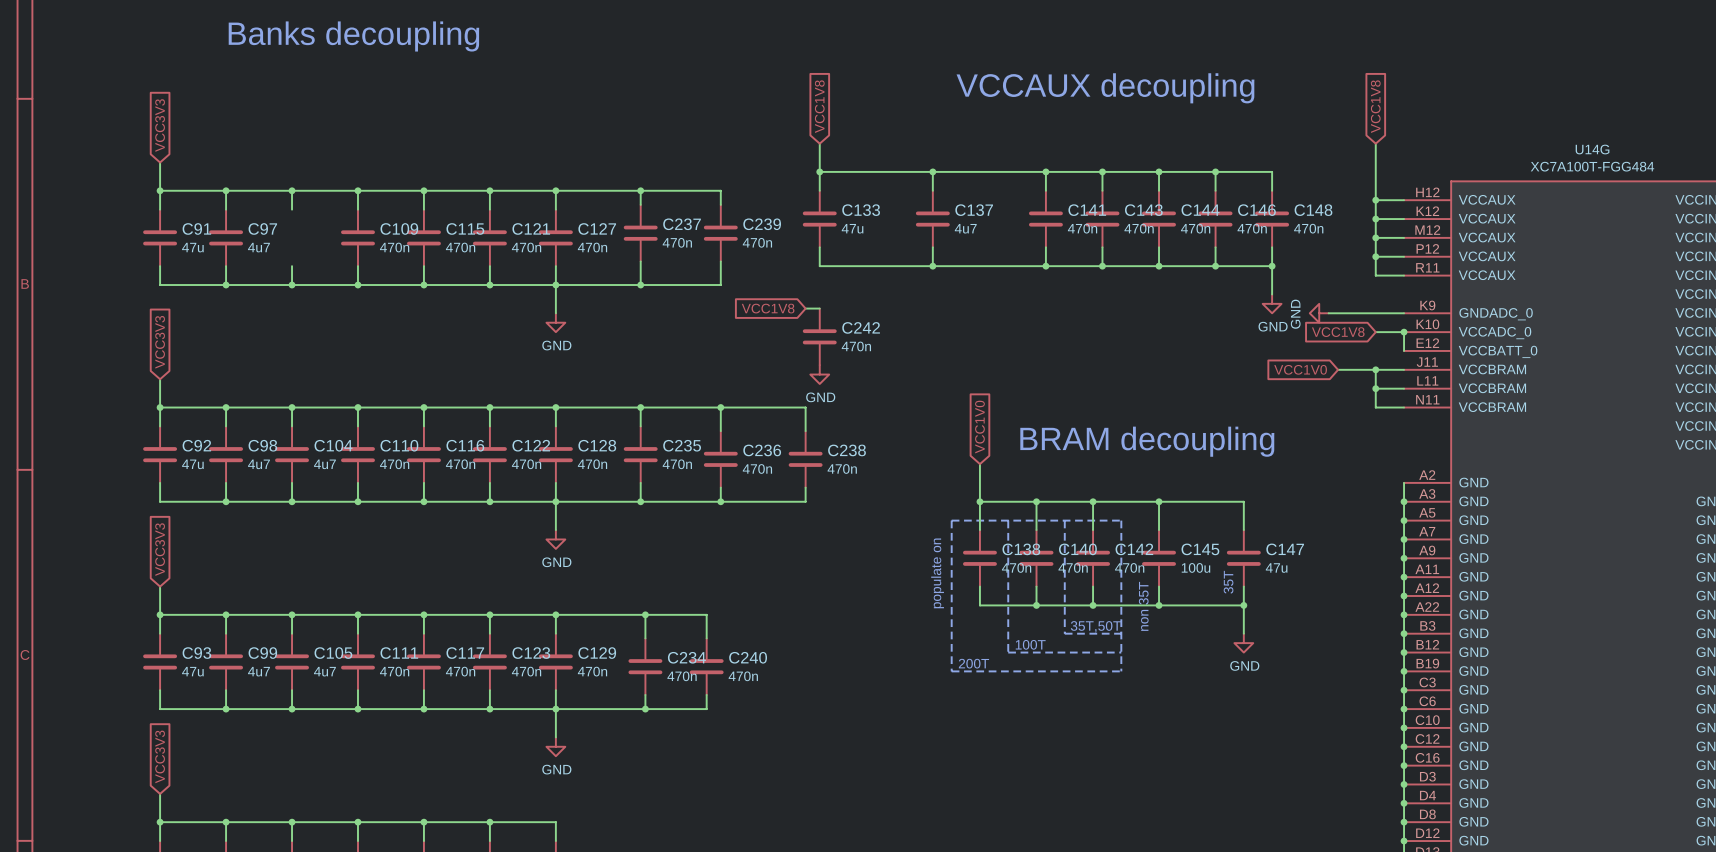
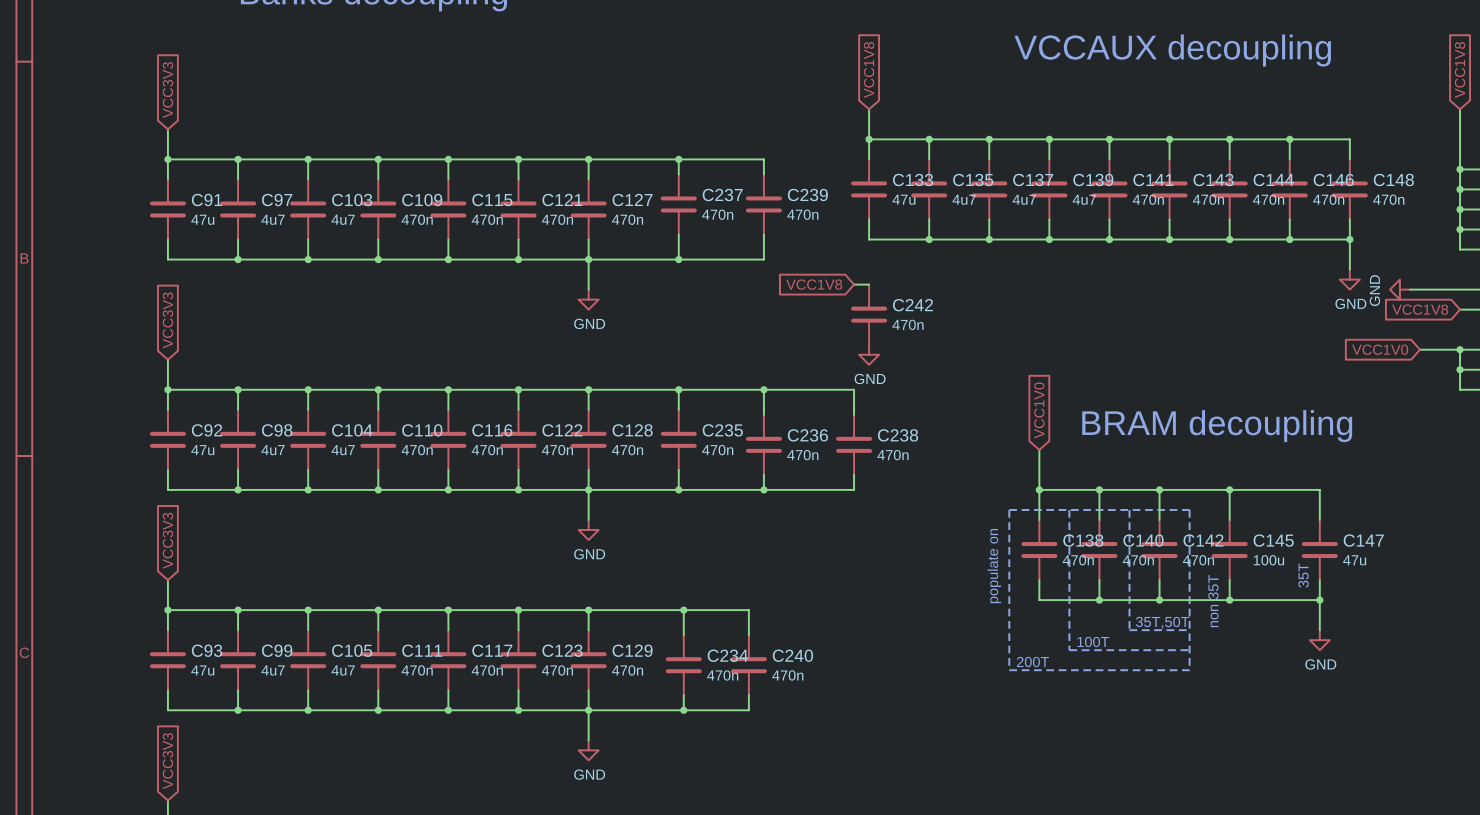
wire: none -> (929, 139) (929, 159)
junction: none -> (929, 139)
wire: none -> (1049, 139) (1049, 159)
junction: none -> (1049, 139)
C135: none -> (929, 189)
C139: none -> (1049, 189)
C103: none -> (308, 209)
wire: none -> (929, 219) (929, 239)
wire: none -> (1049, 219) (1049, 239)
junction: none -> (929, 239)
junction: none -> (1049, 239)

